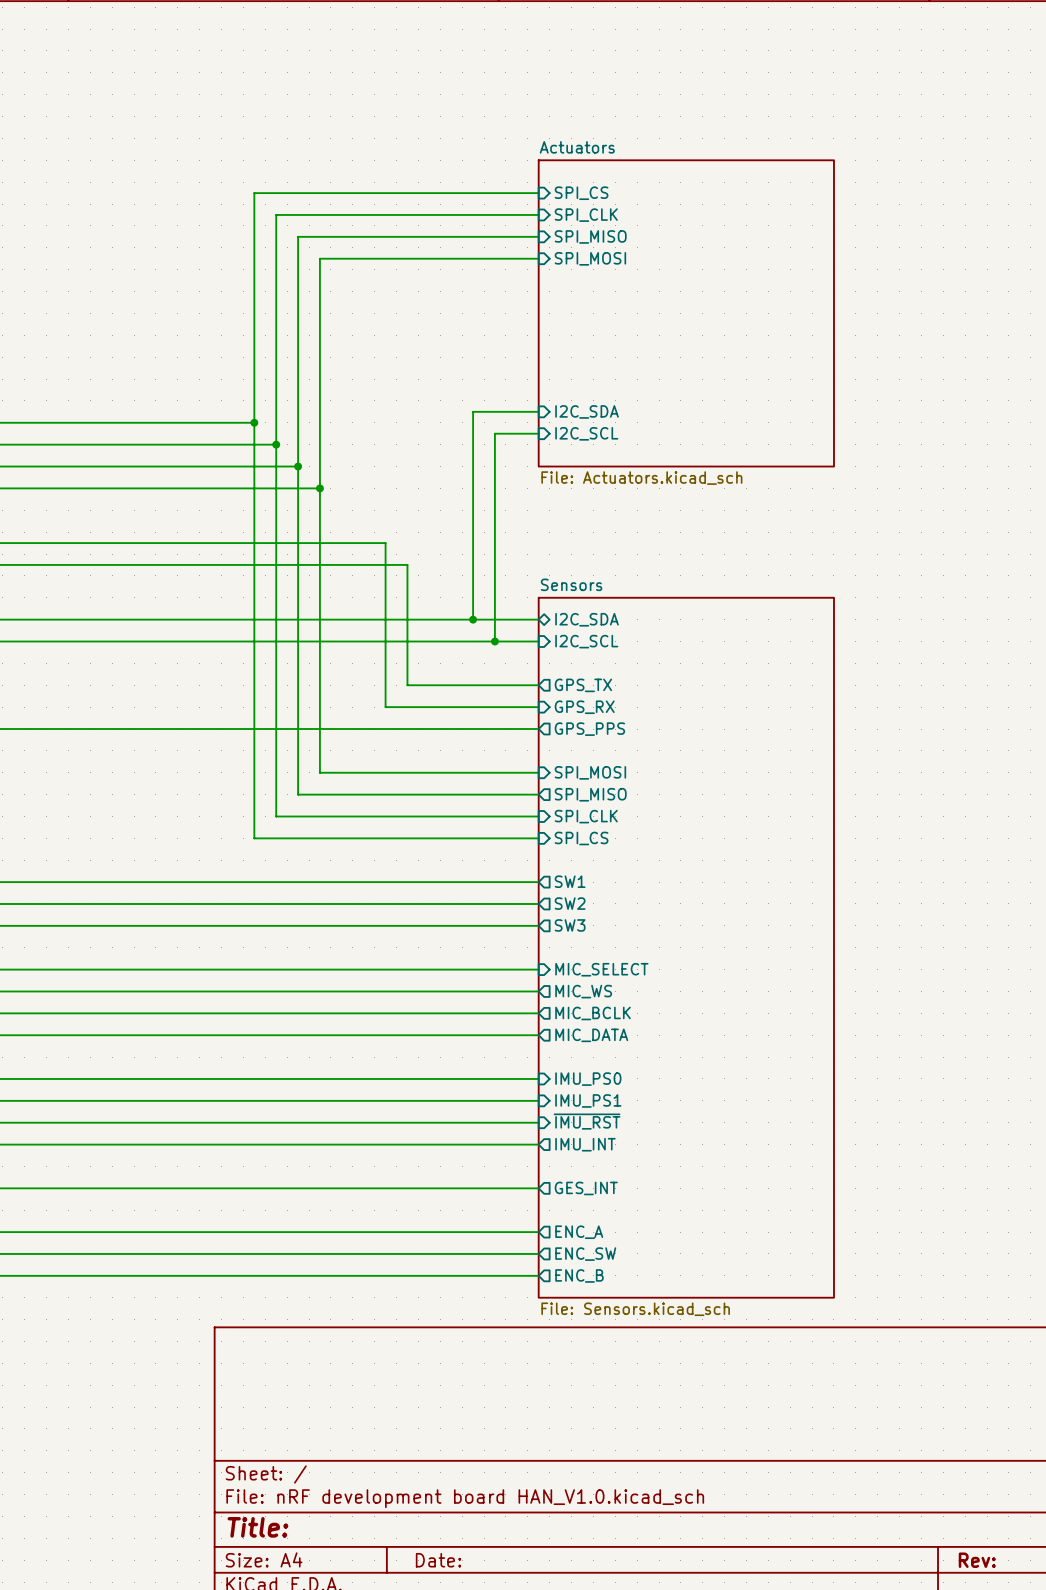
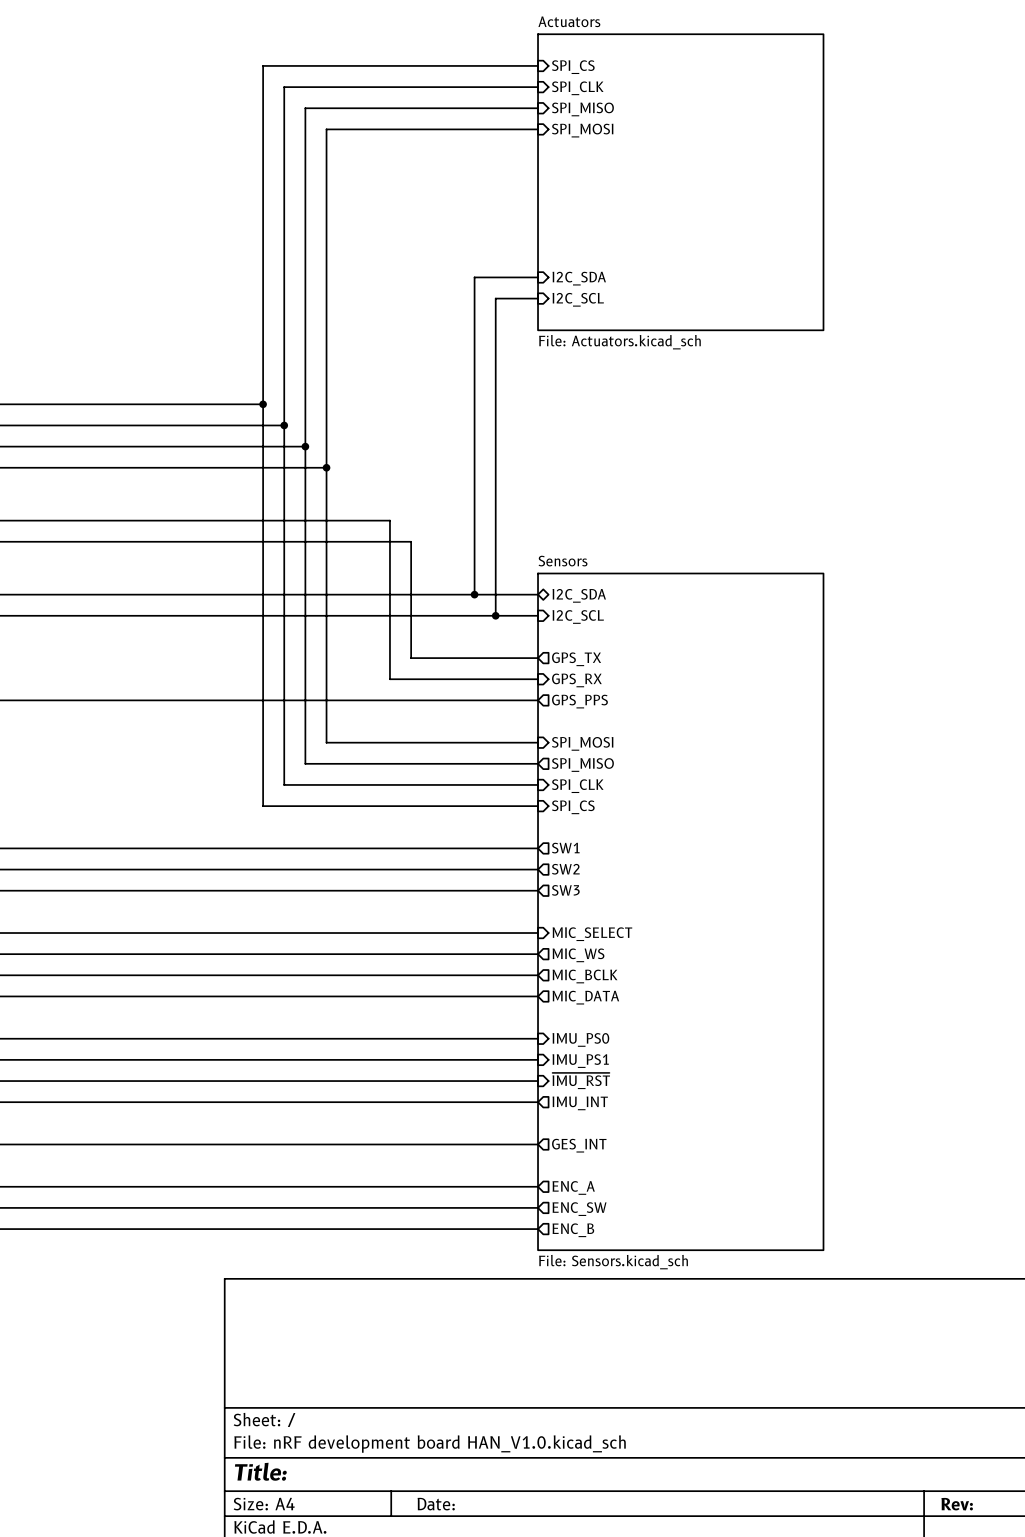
wire: (254, 193) (538, 193) -> (263, 182) (263, 65) (538, 65)
sheet pin position: SPI_CS (581, 193) -> SPI_CS (573, 67)
wire: (276, 214) (538, 214) -> (284, 203) (284, 87) (538, 87)
sheet pin position: SPI_CLK (586, 215) -> SPI_CLK (577, 88)
wire: (298, 236) (538, 236) -> (305, 224) (305, 108) (538, 108)
sheet pin position: SPI_MISO (590, 236) -> SPI_MISO (582, 109)
wire: (319, 258) (538, 258) -> (326, 245) (326, 129) (538, 129)
sheet pin position: SPI_MOSI (590, 258) -> SPI_MOSI (582, 130)
sheet Actuators position: (686, 313) -> (680, 182)
wire: (473, 411) (538, 411) -> (474, 393) (474, 277) (538, 277)
sheet pin position: I2C_SDA (587, 411) -> I2C_SDA (579, 278)
wire: (494, 433) (538, 433) -> (495, 414) (495, 298) (538, 298)
sheet pin position: I2C_SCL (586, 433) -> I2C_SCL (578, 299)

